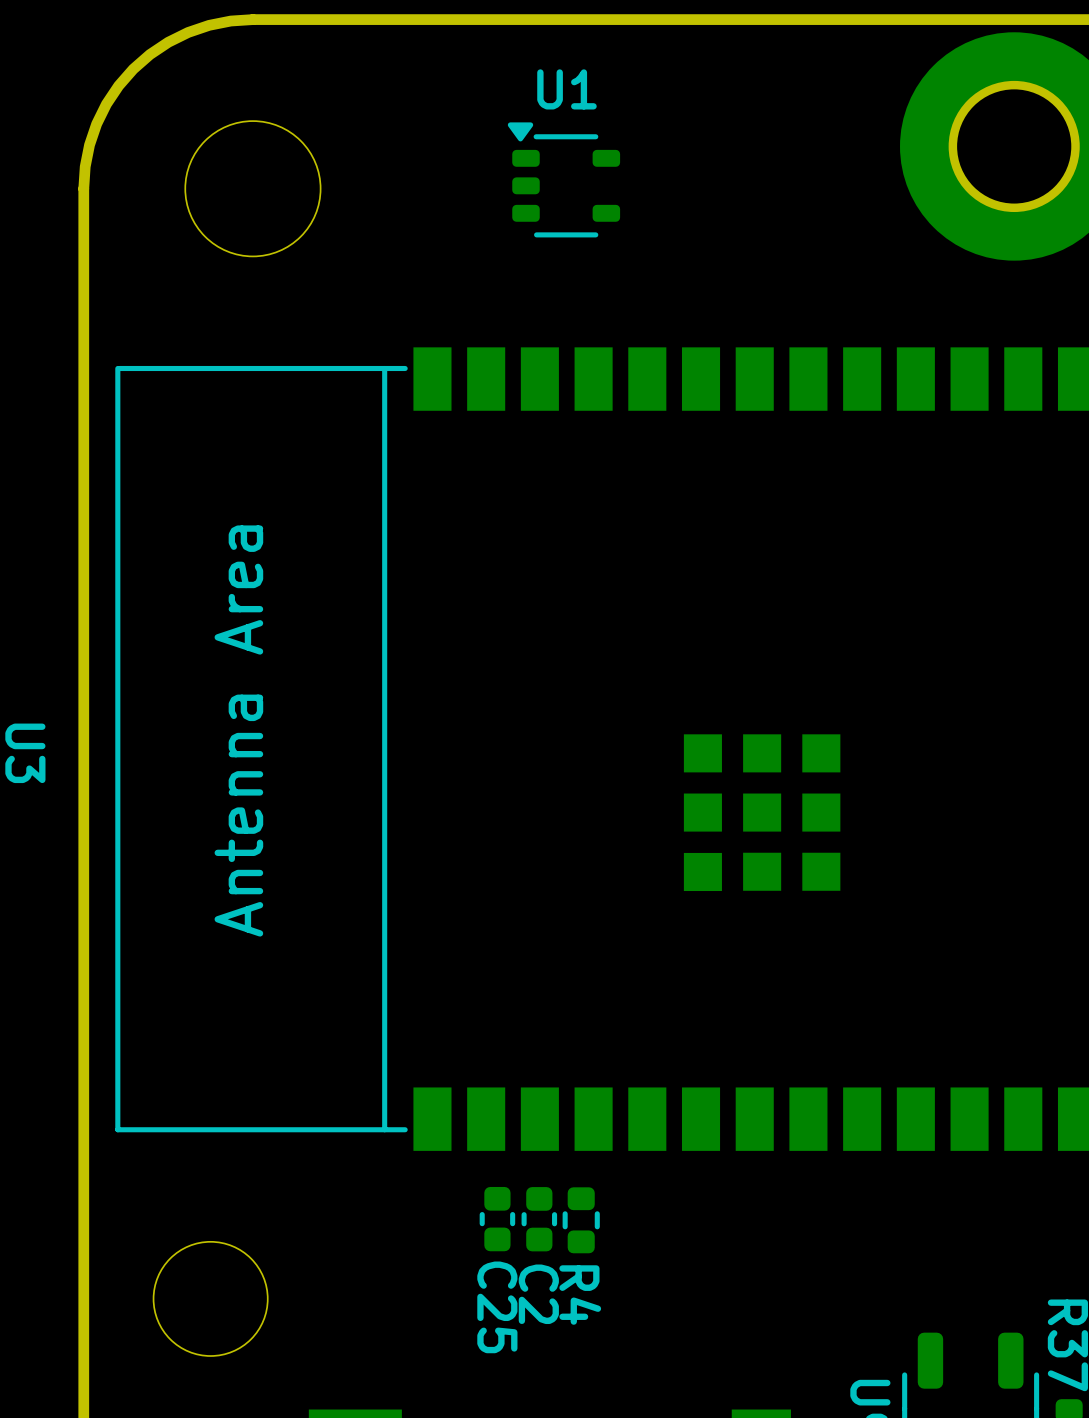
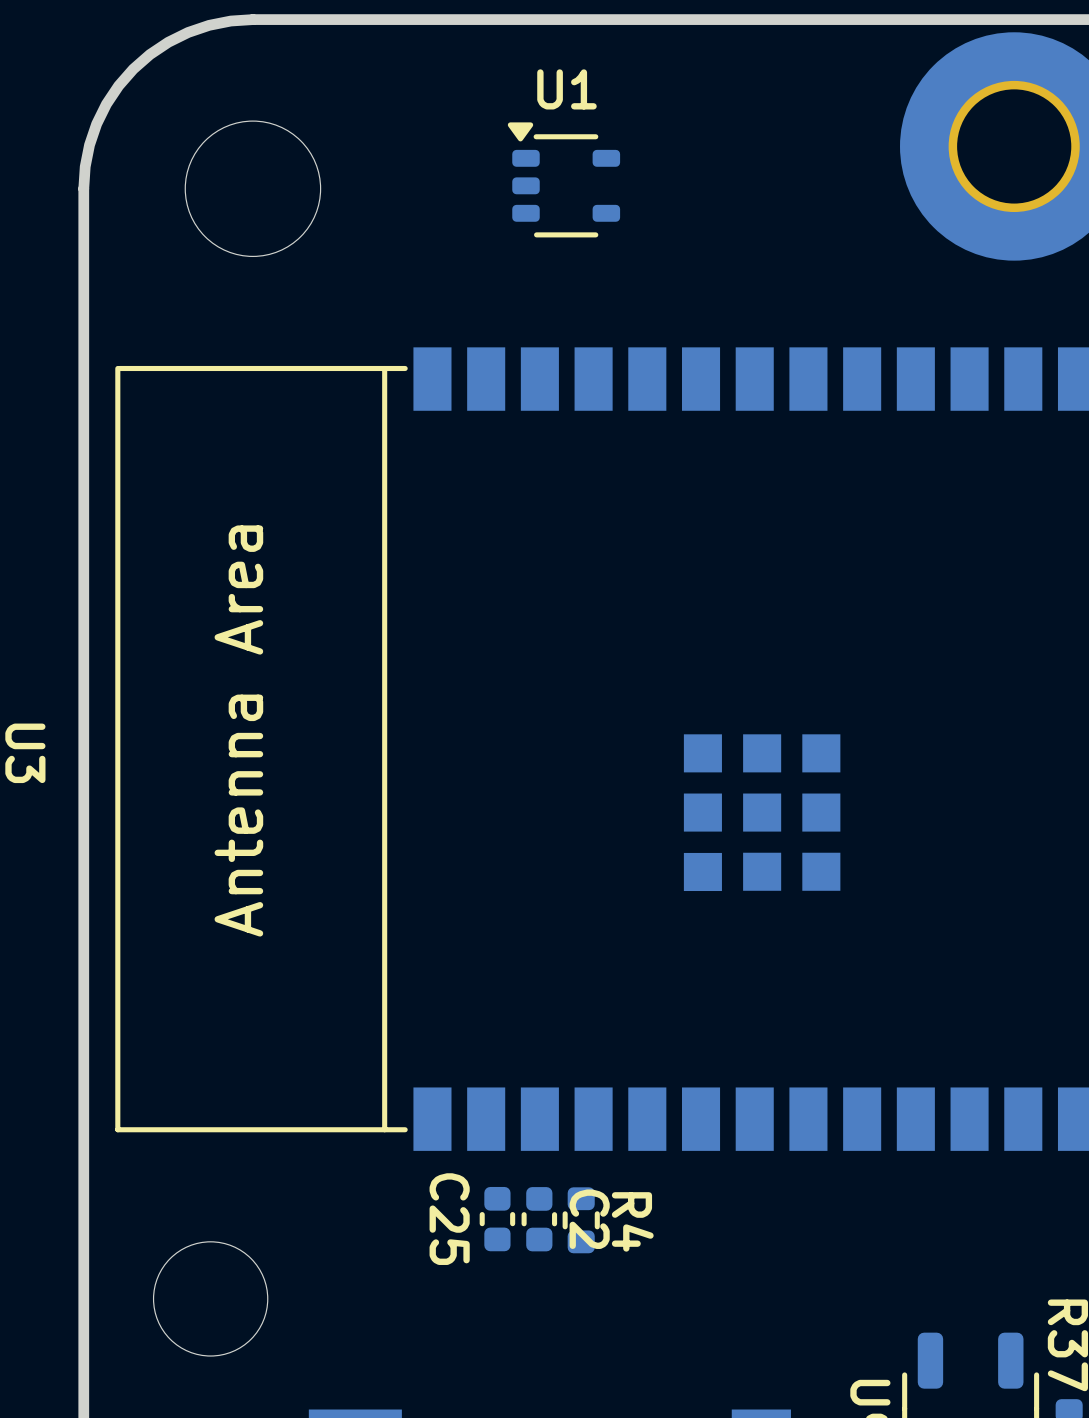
C2 name position: C2 (538, 1294) -> C2 (589, 1219)
R4 name position: R4 (580, 1295) -> R4 (632, 1221)
C25 name position: C25 (497, 1307) -> C25 (449, 1219)

